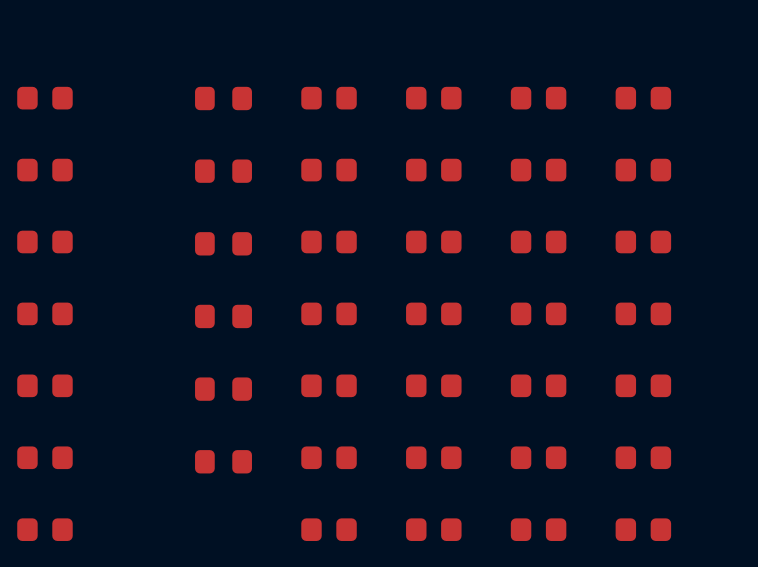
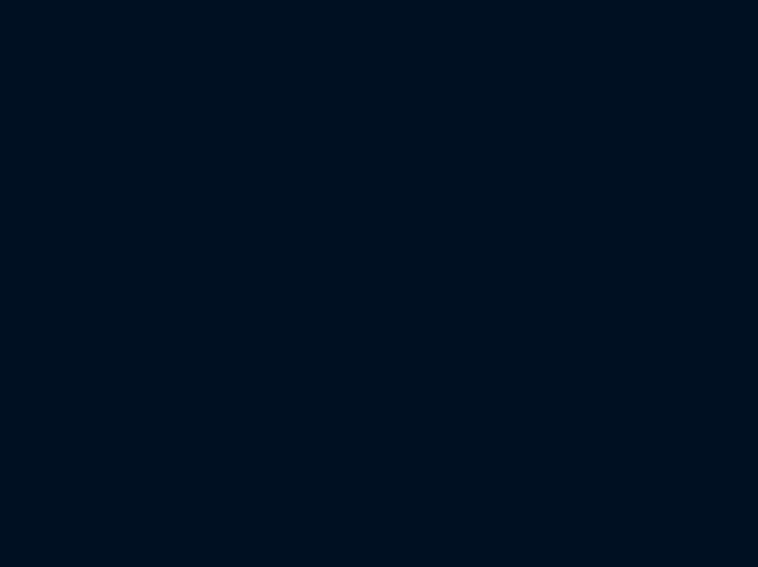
part: (44, 98) -> none
part: (223, 98) -> none
part: (329, 98) -> none
part: (433, 98) -> none
part: (538, 98) -> none
part: (643, 98) -> none
part: (44, 170) -> none
part: (329, 170) -> none
part: (433, 170) -> none
part: (538, 170) -> none
part: (643, 170) -> none
part: (223, 171) -> none
part: (44, 241) -> none
part: (329, 241) -> none
part: (433, 241) -> none
part: (538, 241) -> none
part: (643, 241) -> none
part: (223, 243) -> none
part: (44, 313) -> none
part: (329, 313) -> none
part: (433, 313) -> none
part: (538, 313) -> none
part: (643, 313) -> none
part: (223, 316) -> none
part: (44, 385) -> none
part: (329, 385) -> none
part: (433, 385) -> none
part: (538, 385) -> none
part: (643, 385) -> none
part: (223, 389) -> none
part: (44, 457) -> none
part: (329, 457) -> none
part: (433, 457) -> none
part: (538, 457) -> none
part: (643, 457) -> none
part: (223, 461) -> none
part: (44, 529) -> none
part: (329, 529) -> none
part: (433, 529) -> none
part: (538, 529) -> none
part: (643, 529) -> none

